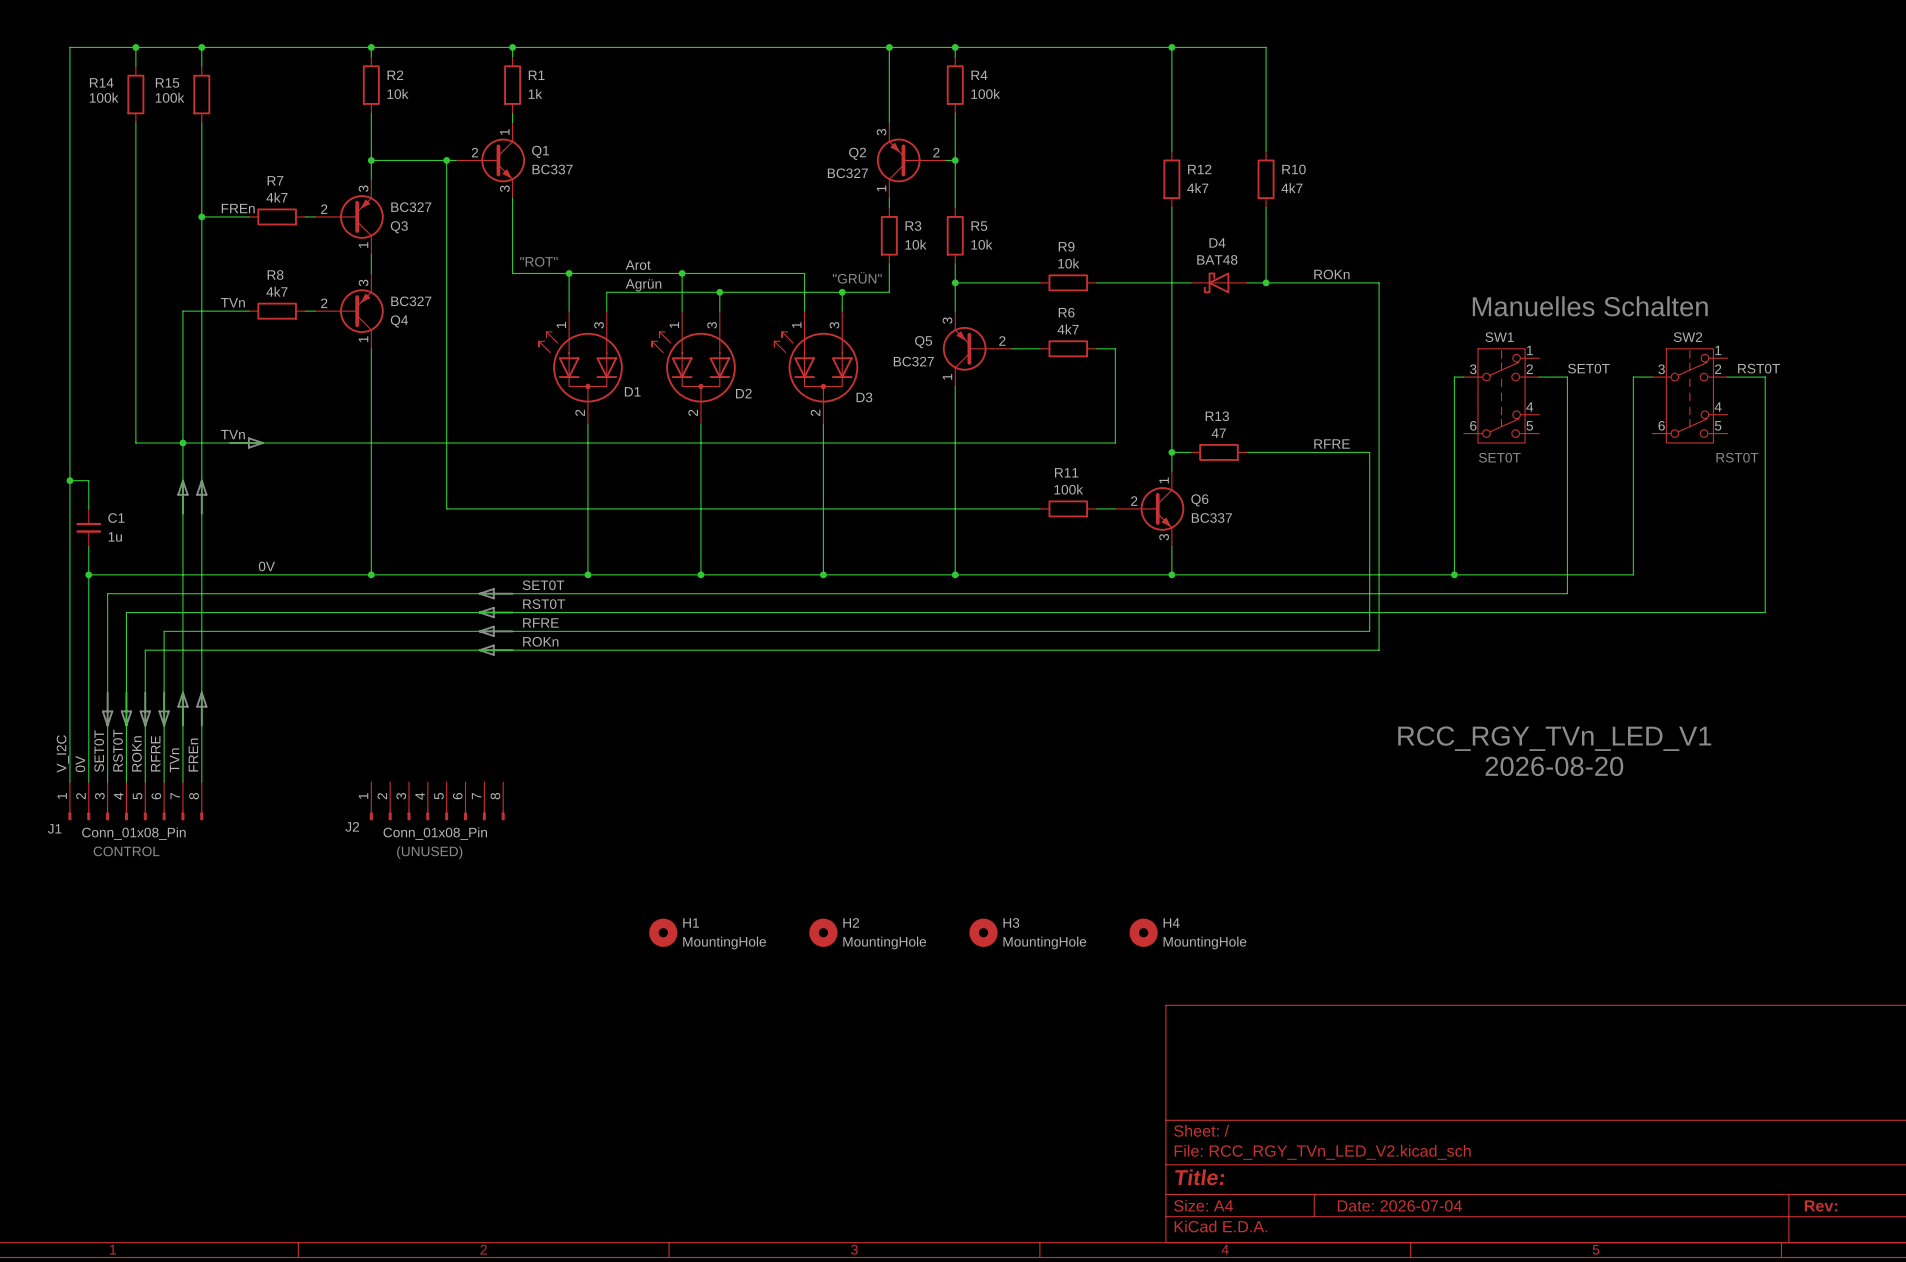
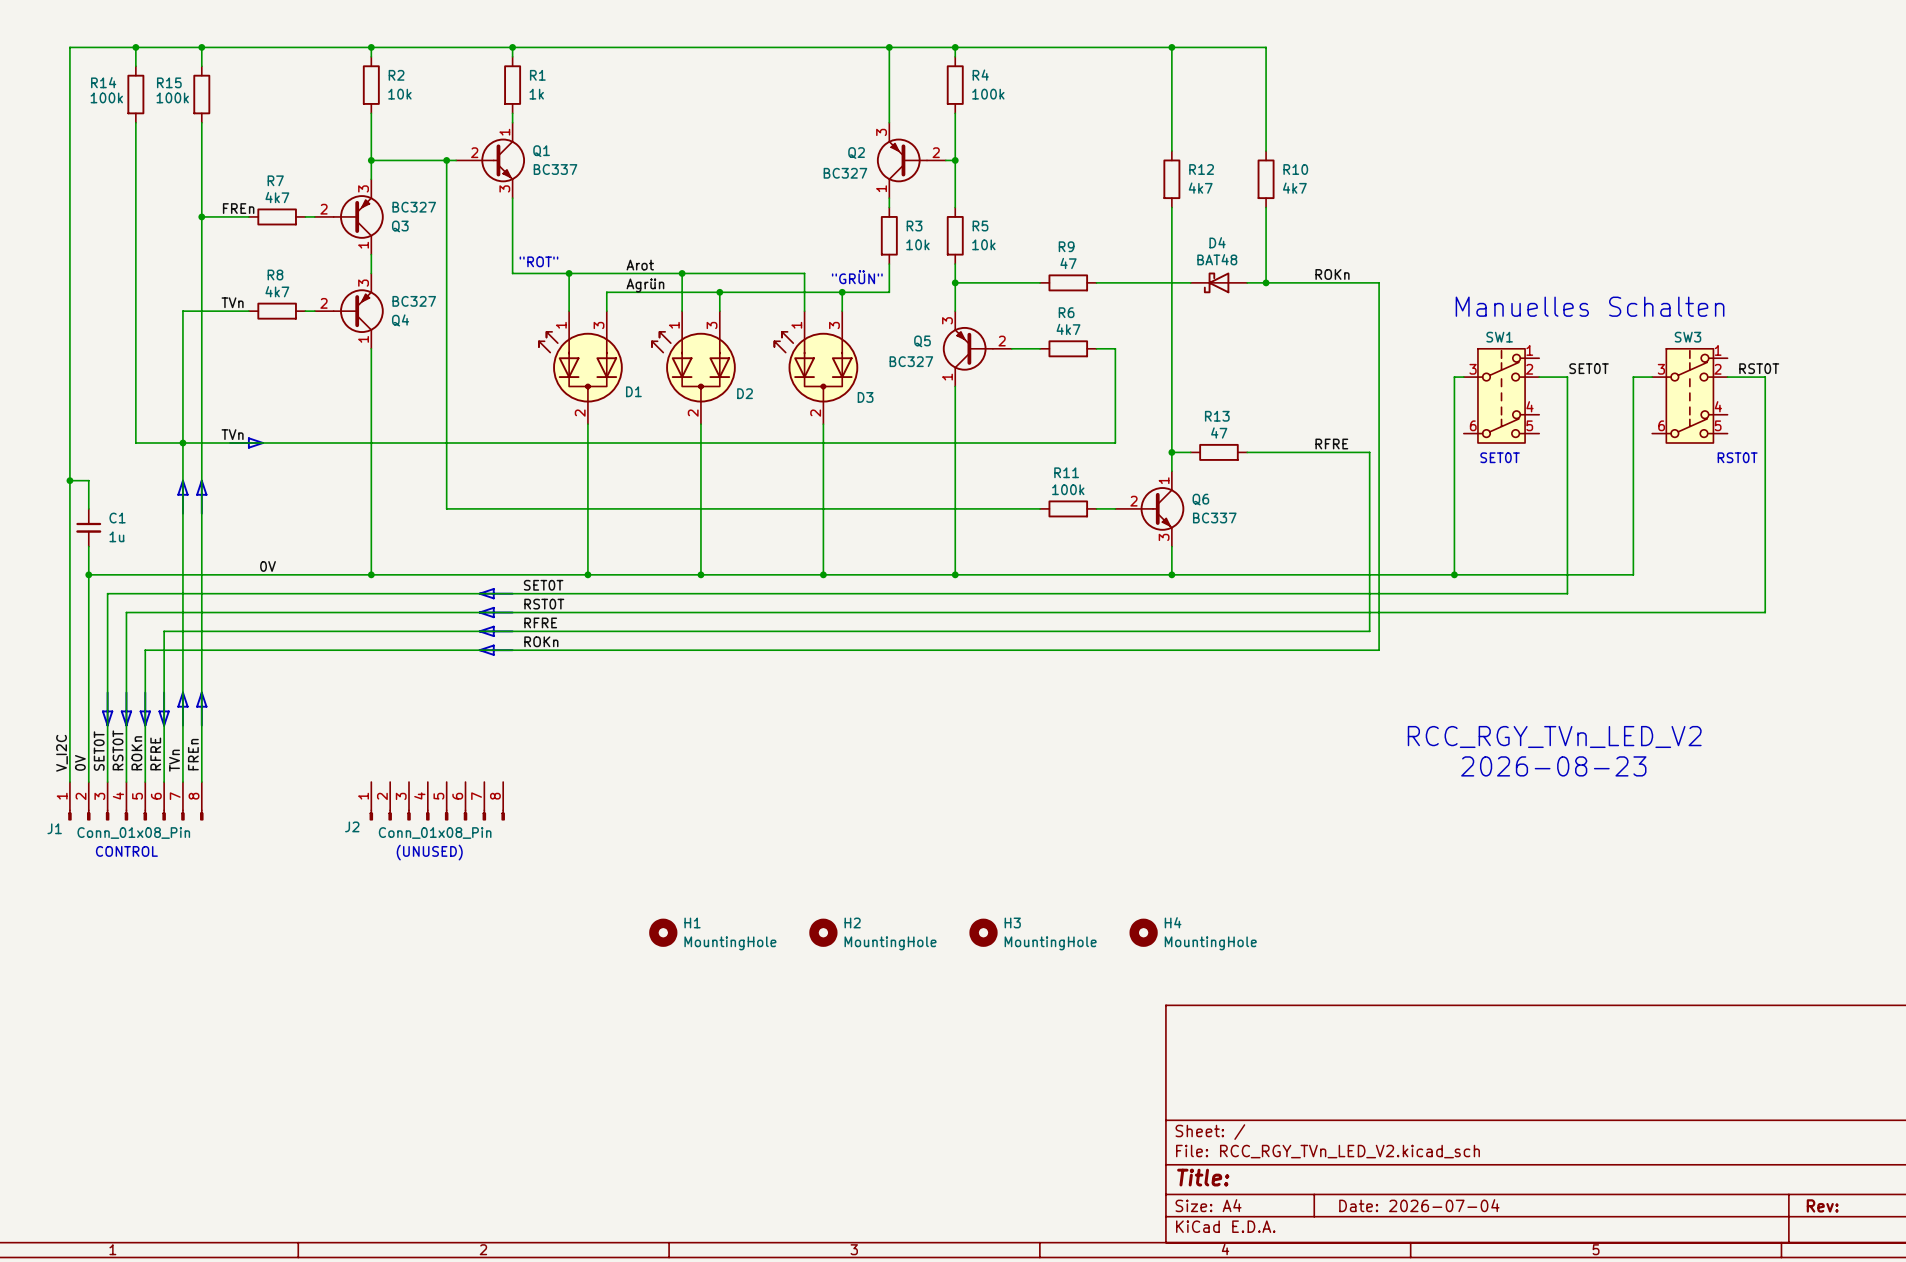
R9 value: 10k (1068, 263) -> 47 (1068, 263)
SW2 name: SW2 (1687, 337) -> SW3 (1688, 337)
text: RCC_RGY_TVn_LED_V1 (1554, 738) -> RCC_RGY_TVn_LED_V2 (1554, 736)
text: 2026-08-20 (1554, 766) -> 2026-08-23 (1553, 766)

